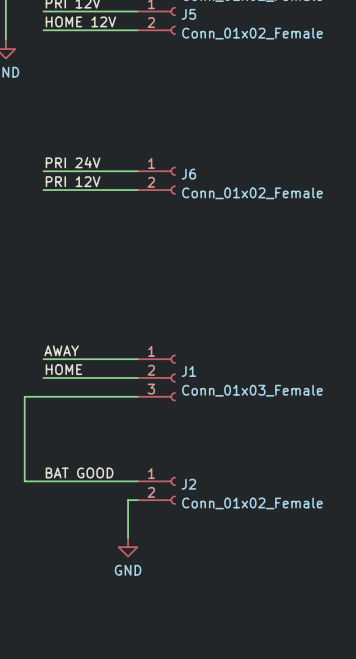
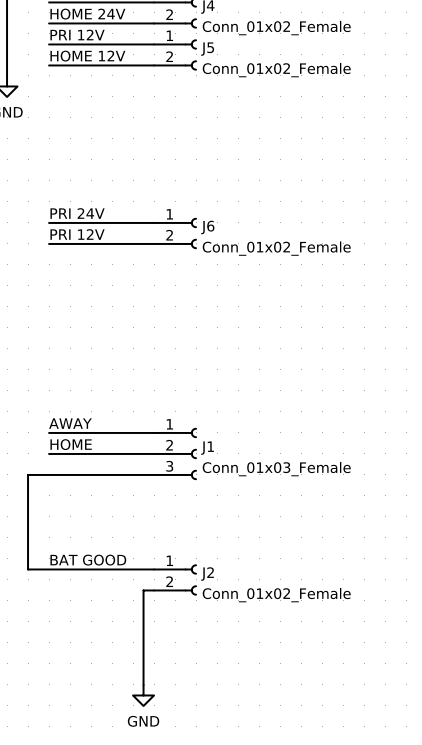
wire: none -> (143, 632) (143, 684)
power symbol position: GND (128, 547) -> GND (143, 695)

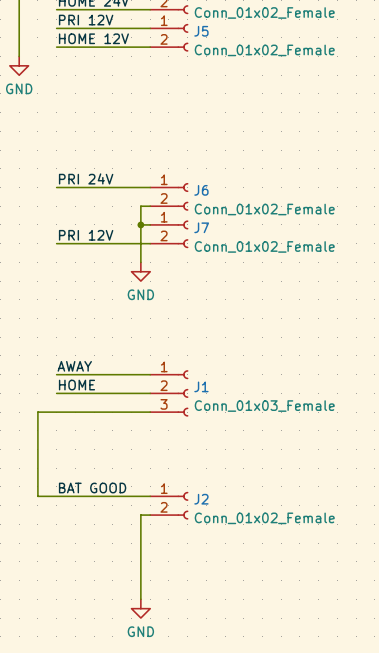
label position: PRI 12V (77, 234) -> PRI 12V (86, 235)
wire: (49, 243) (143, 243) -> (140, 262) (140, 206)
wire: none -> (140, 224) (150, 224)
junction: none -> (140, 224)
J7: none -> Conn_01x02_Female (169, 234)
wire: none -> (56, 243) (150, 243)
power symbol: none -> GND (140, 271)

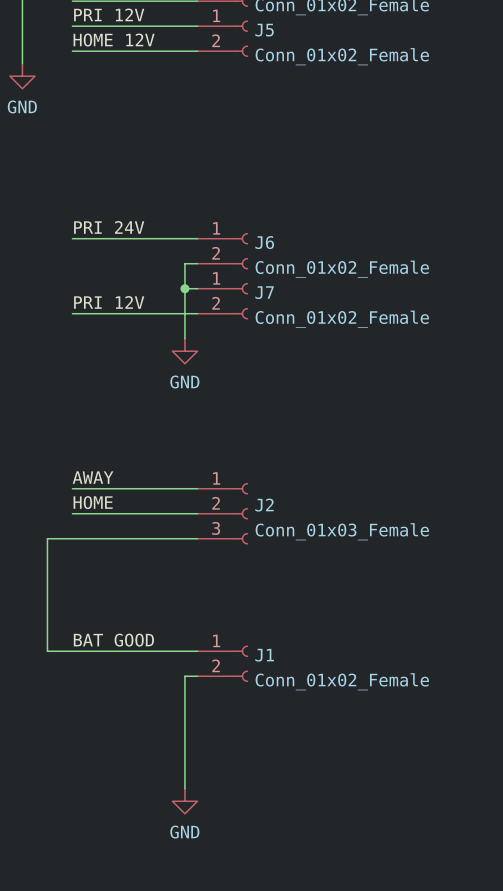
J1 name: J1 (201, 386) -> J2 (264, 505)
J2 name: J2 (201, 499) -> J1 (264, 655)

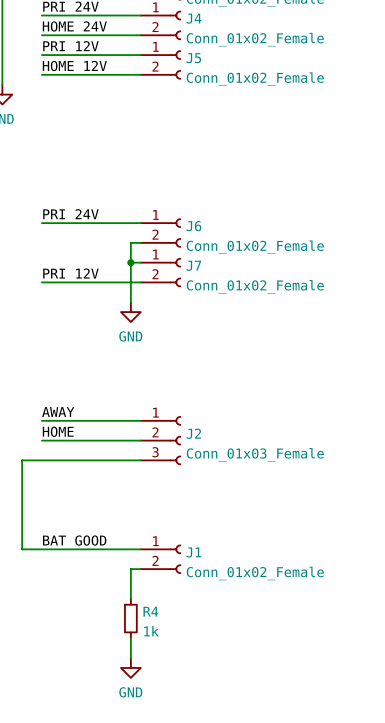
wire: (184, 713) (184, 763) -> none
R4: none -> 1k (130, 618)

